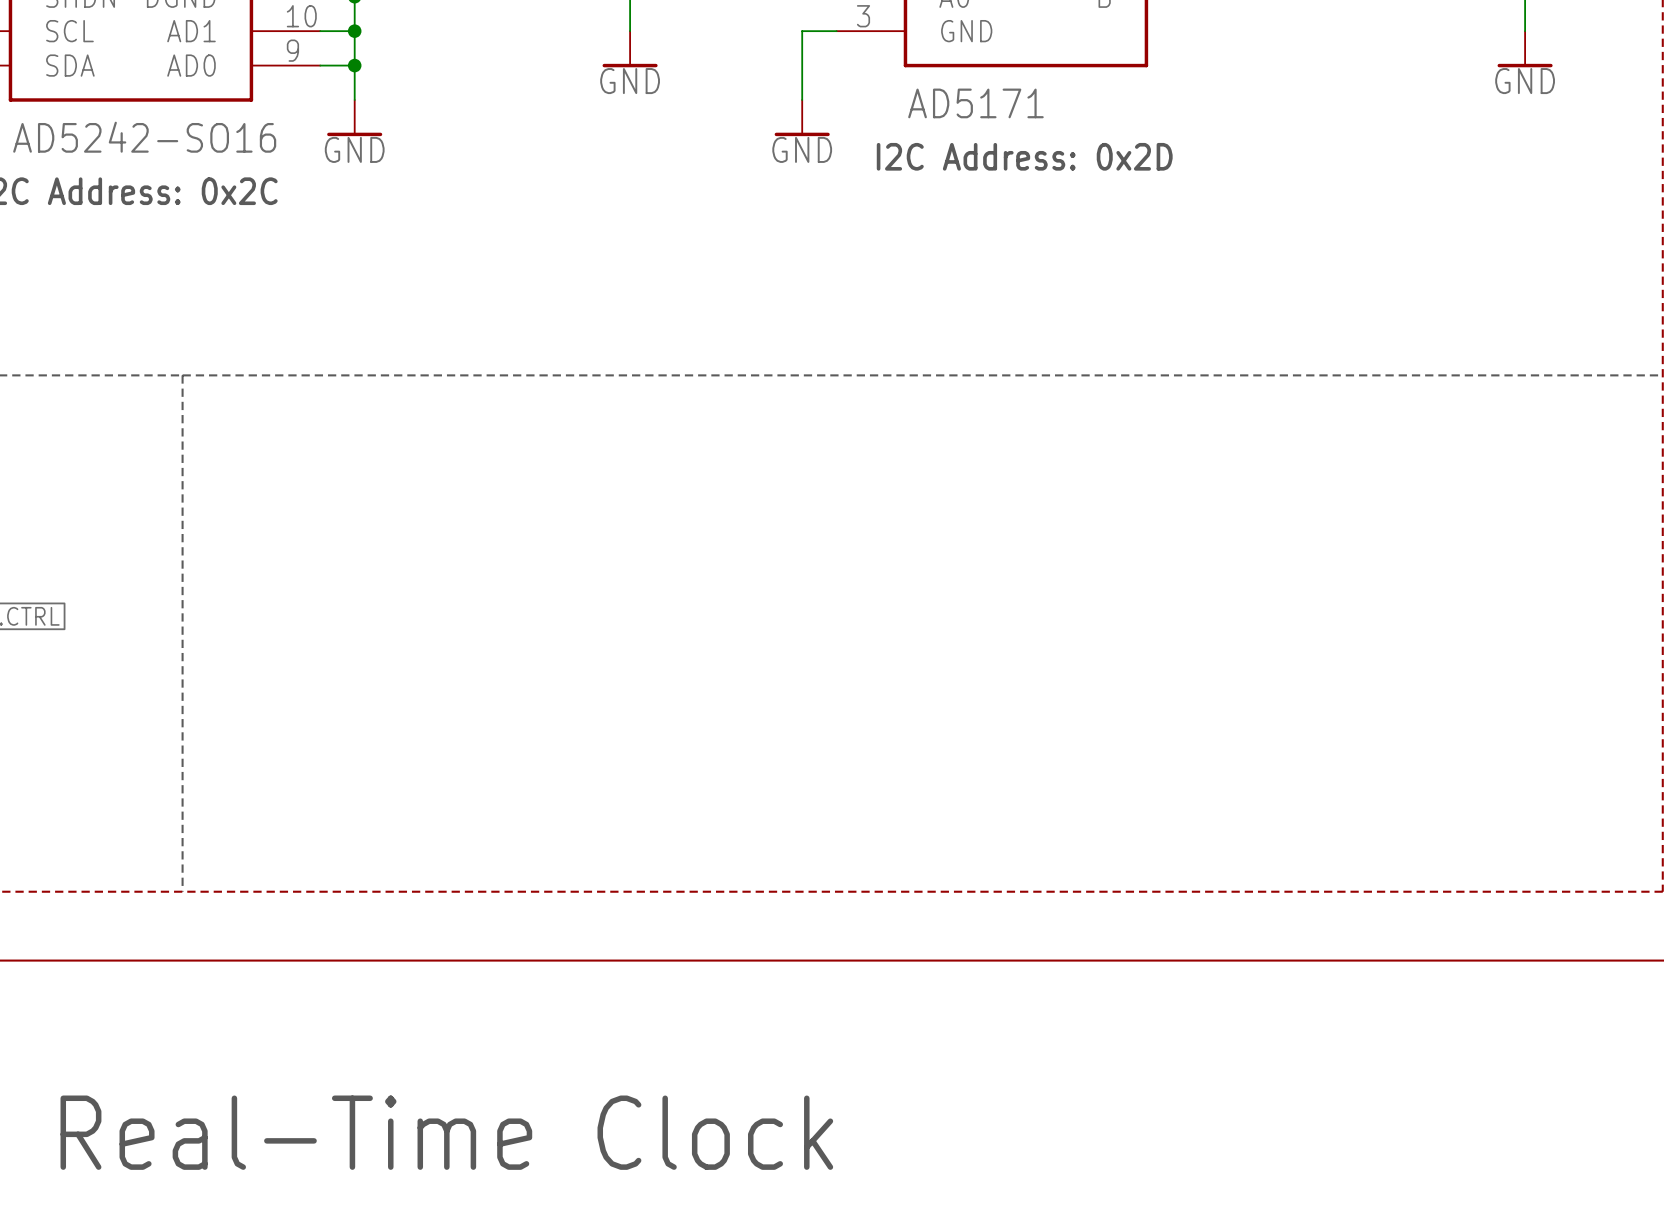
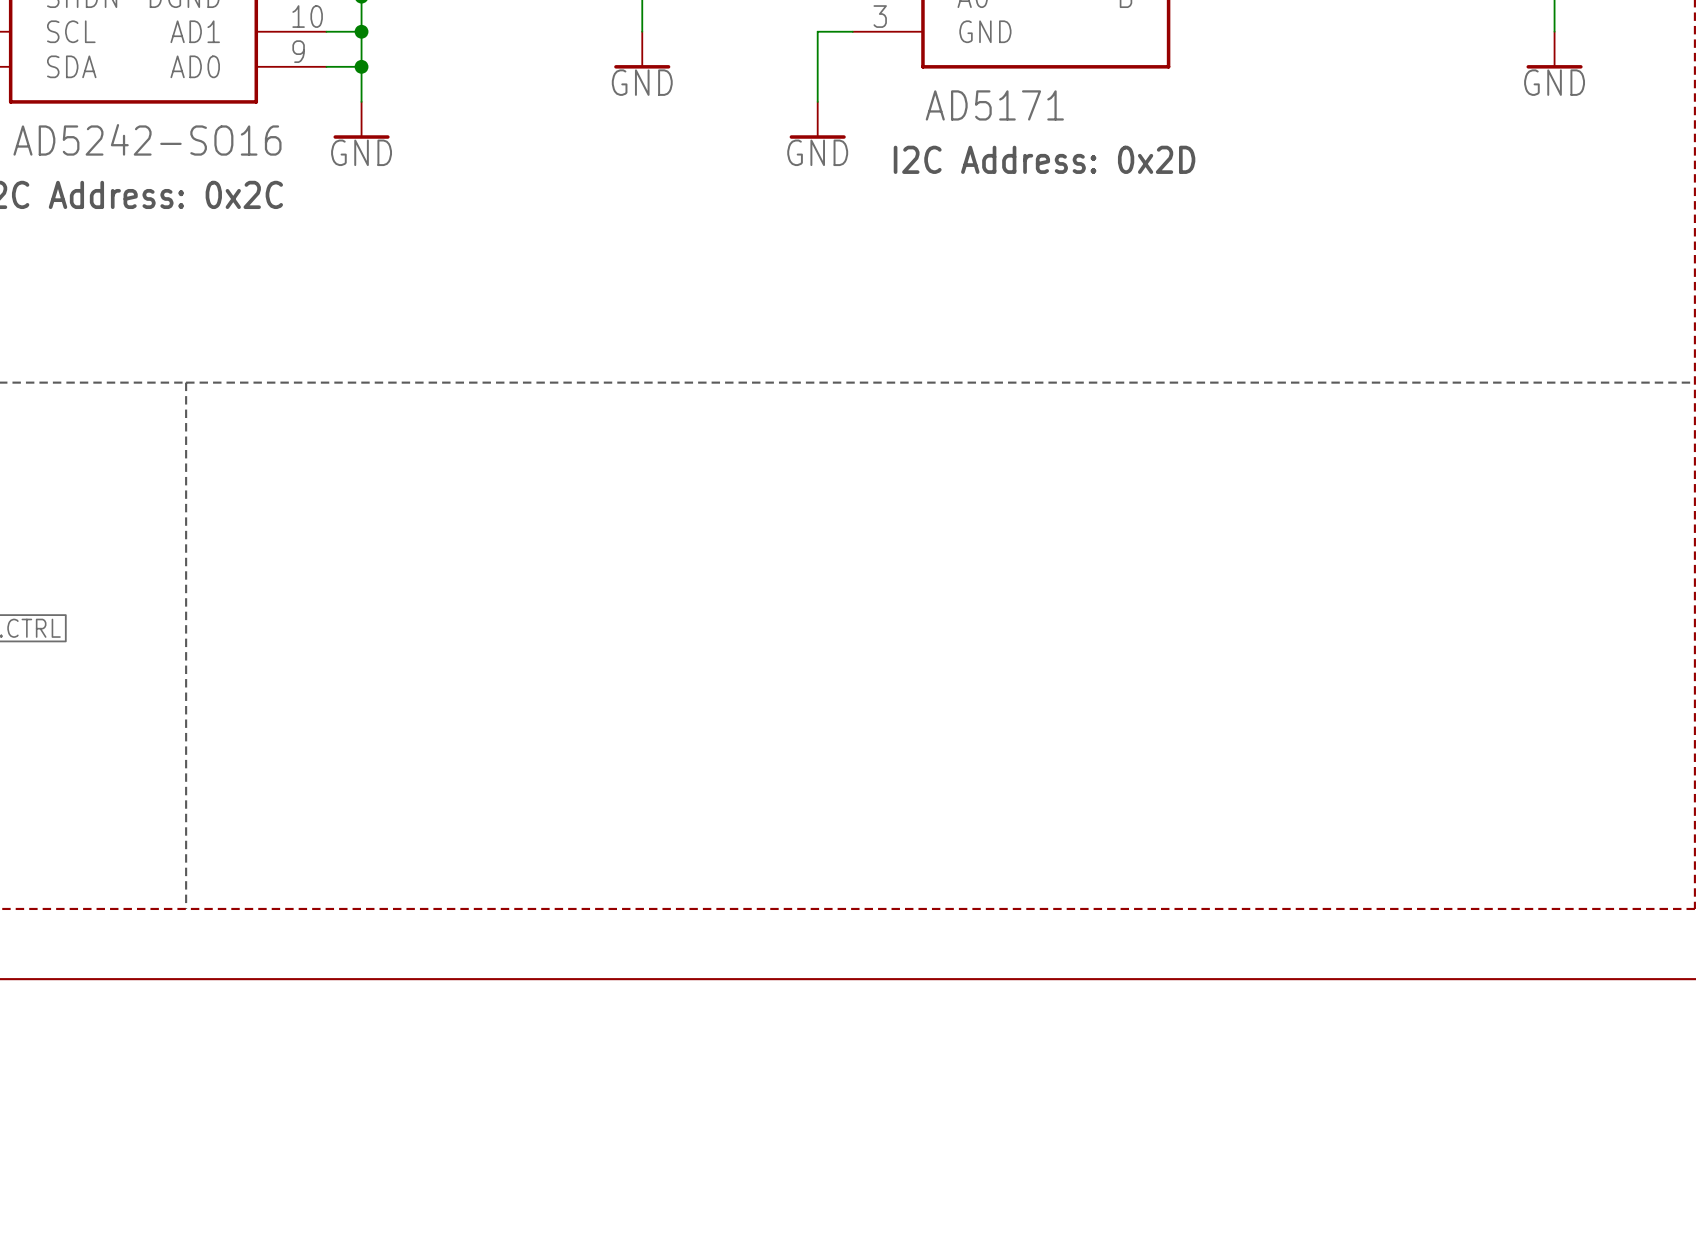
text: Real-Time Clock (446, 1132) -> none

